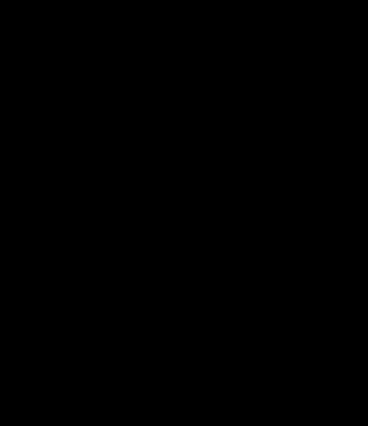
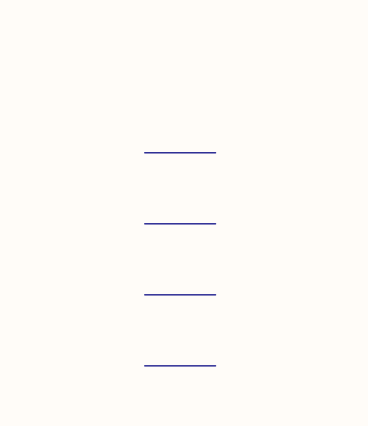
wire: none -> (144, 152) (215, 152)
wire: none -> (144, 223) (215, 223)
wire: none -> (144, 294) (215, 294)
wire: none -> (144, 365) (215, 365)

